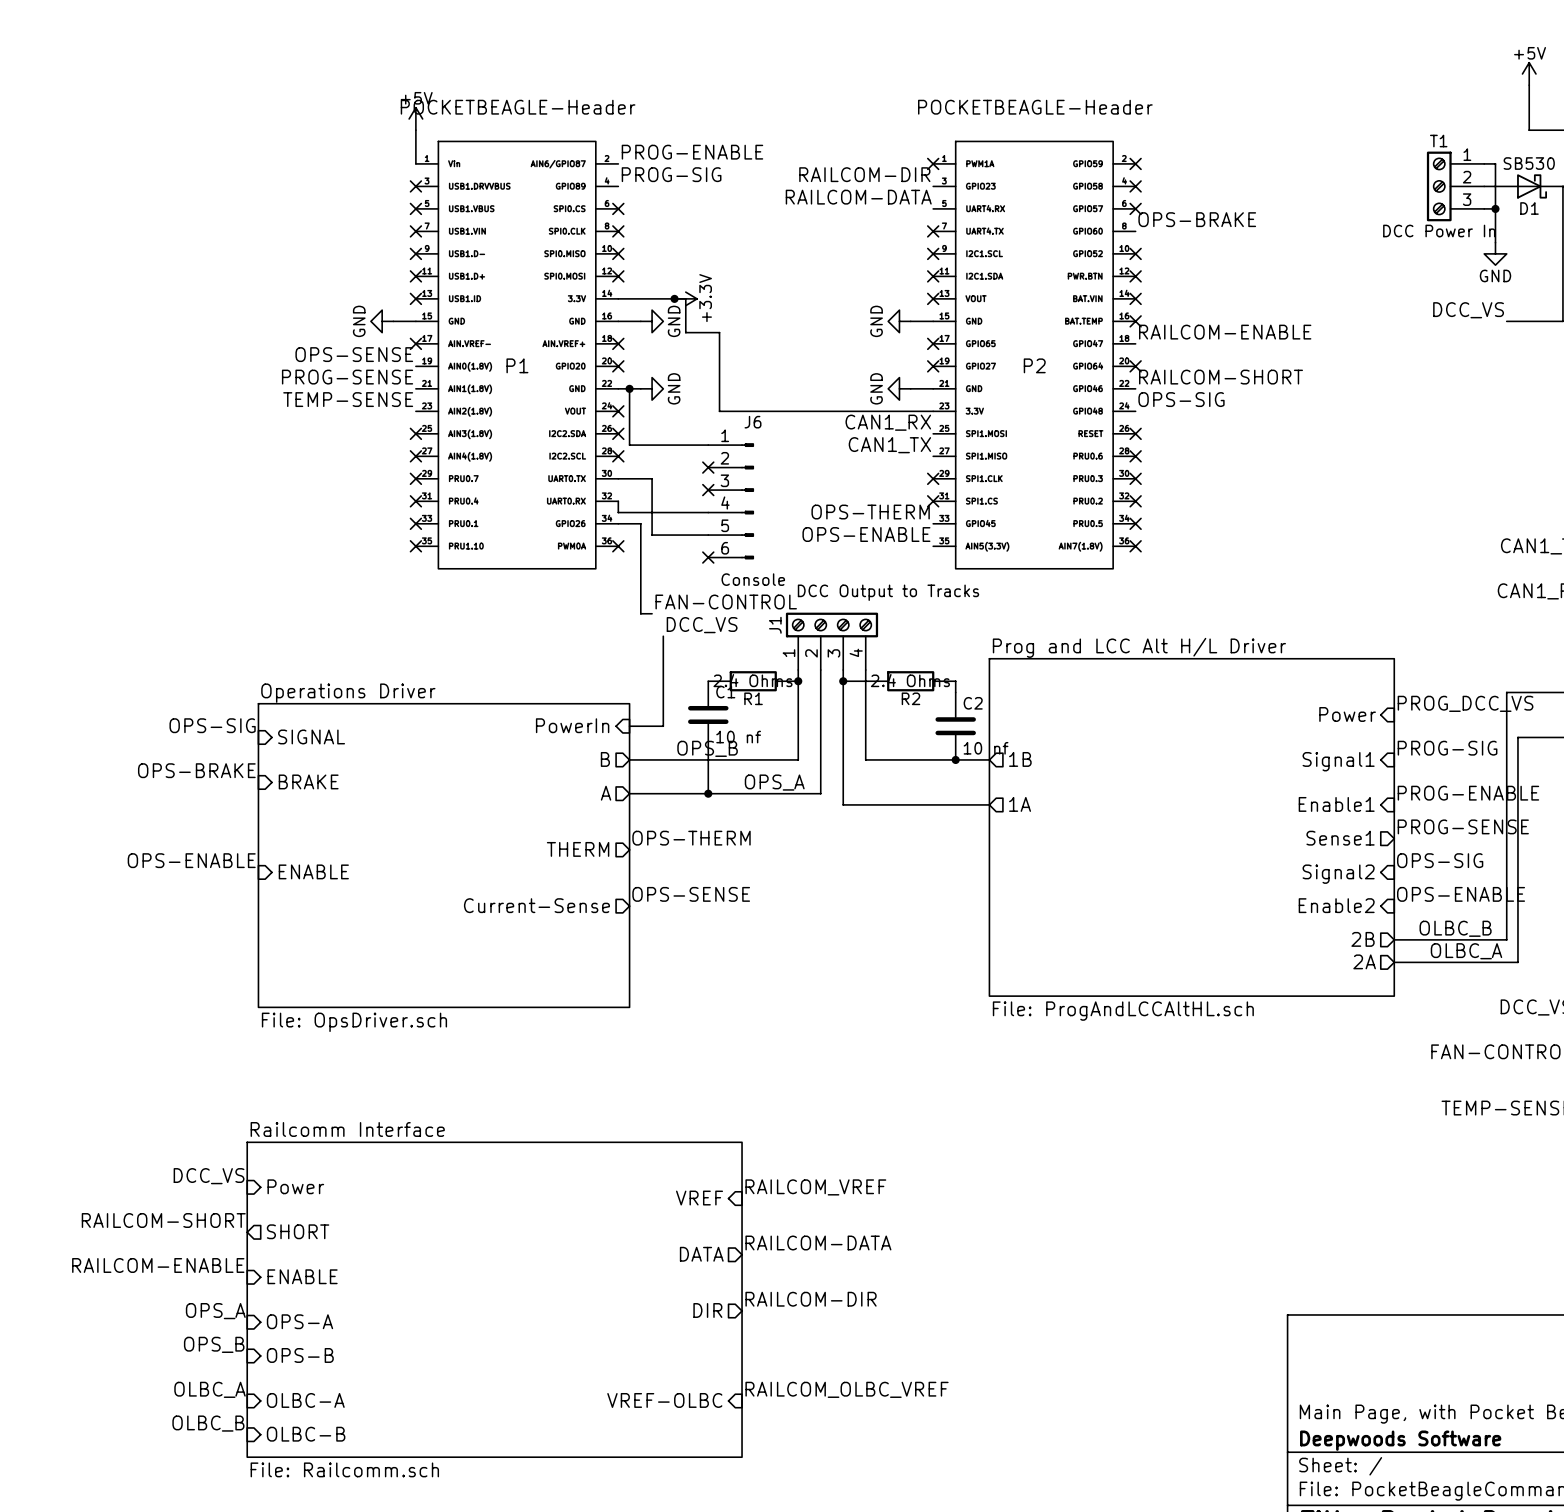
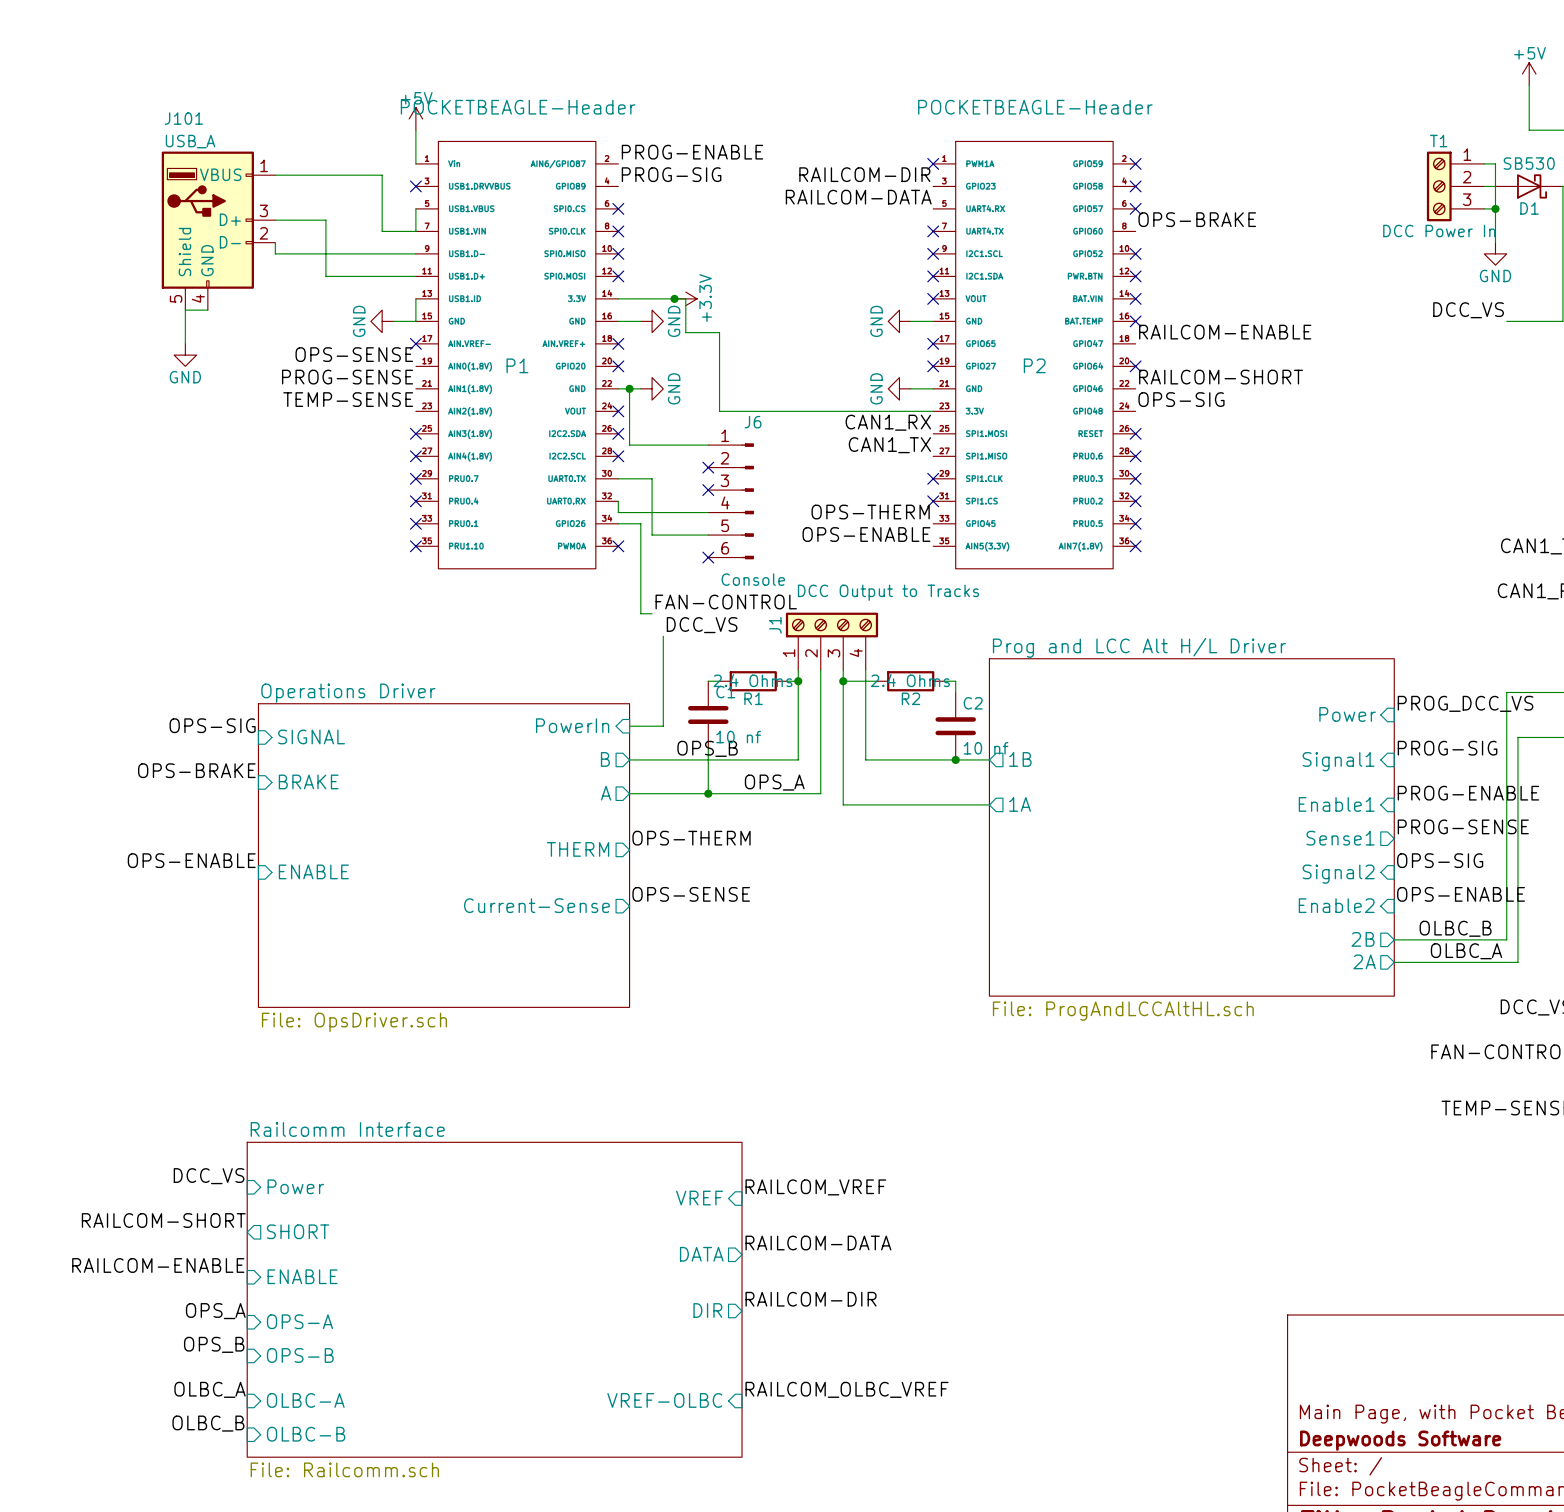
wire: none -> (275, 175) (382, 175) (382, 231) (415, 231) (415, 208)
no-connect mark: (415, 208) -> none
wire: none -> (275, 220) (325, 220) (325, 276) (415, 276)
J101: none -> USB_A (218, 230)
no-connect mark: (415, 231) -> none
wire: none -> (275, 242) (275, 253) (415, 253)
no-connect mark: (415, 253) -> none
no-connect mark: (415, 276) -> none
wire: none -> (415, 298) (415, 321)
no-connect mark: (415, 298) -> none
wire: none -> (207, 310) (185, 310) (185, 343)
power symbol: none -> GND (185, 355)

